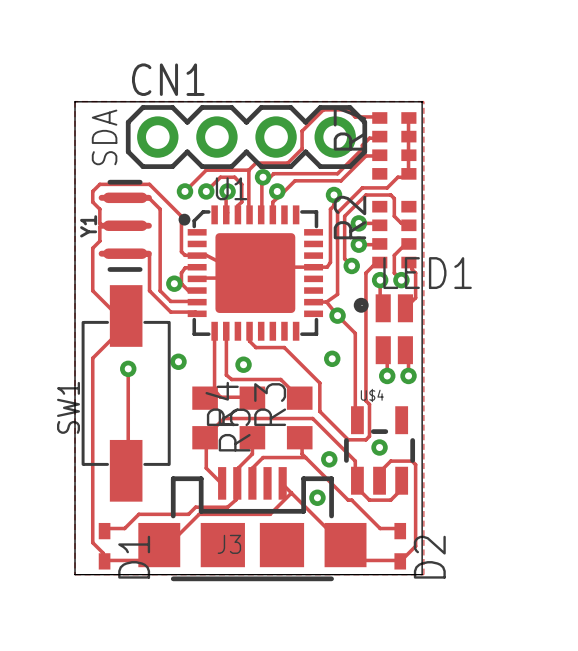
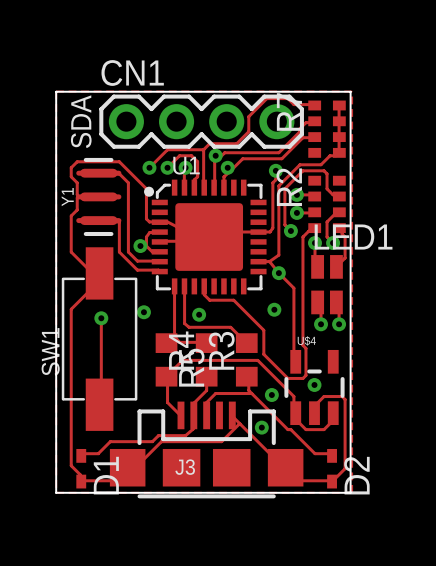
drawing: [353, 297, 369, 313] -> none

